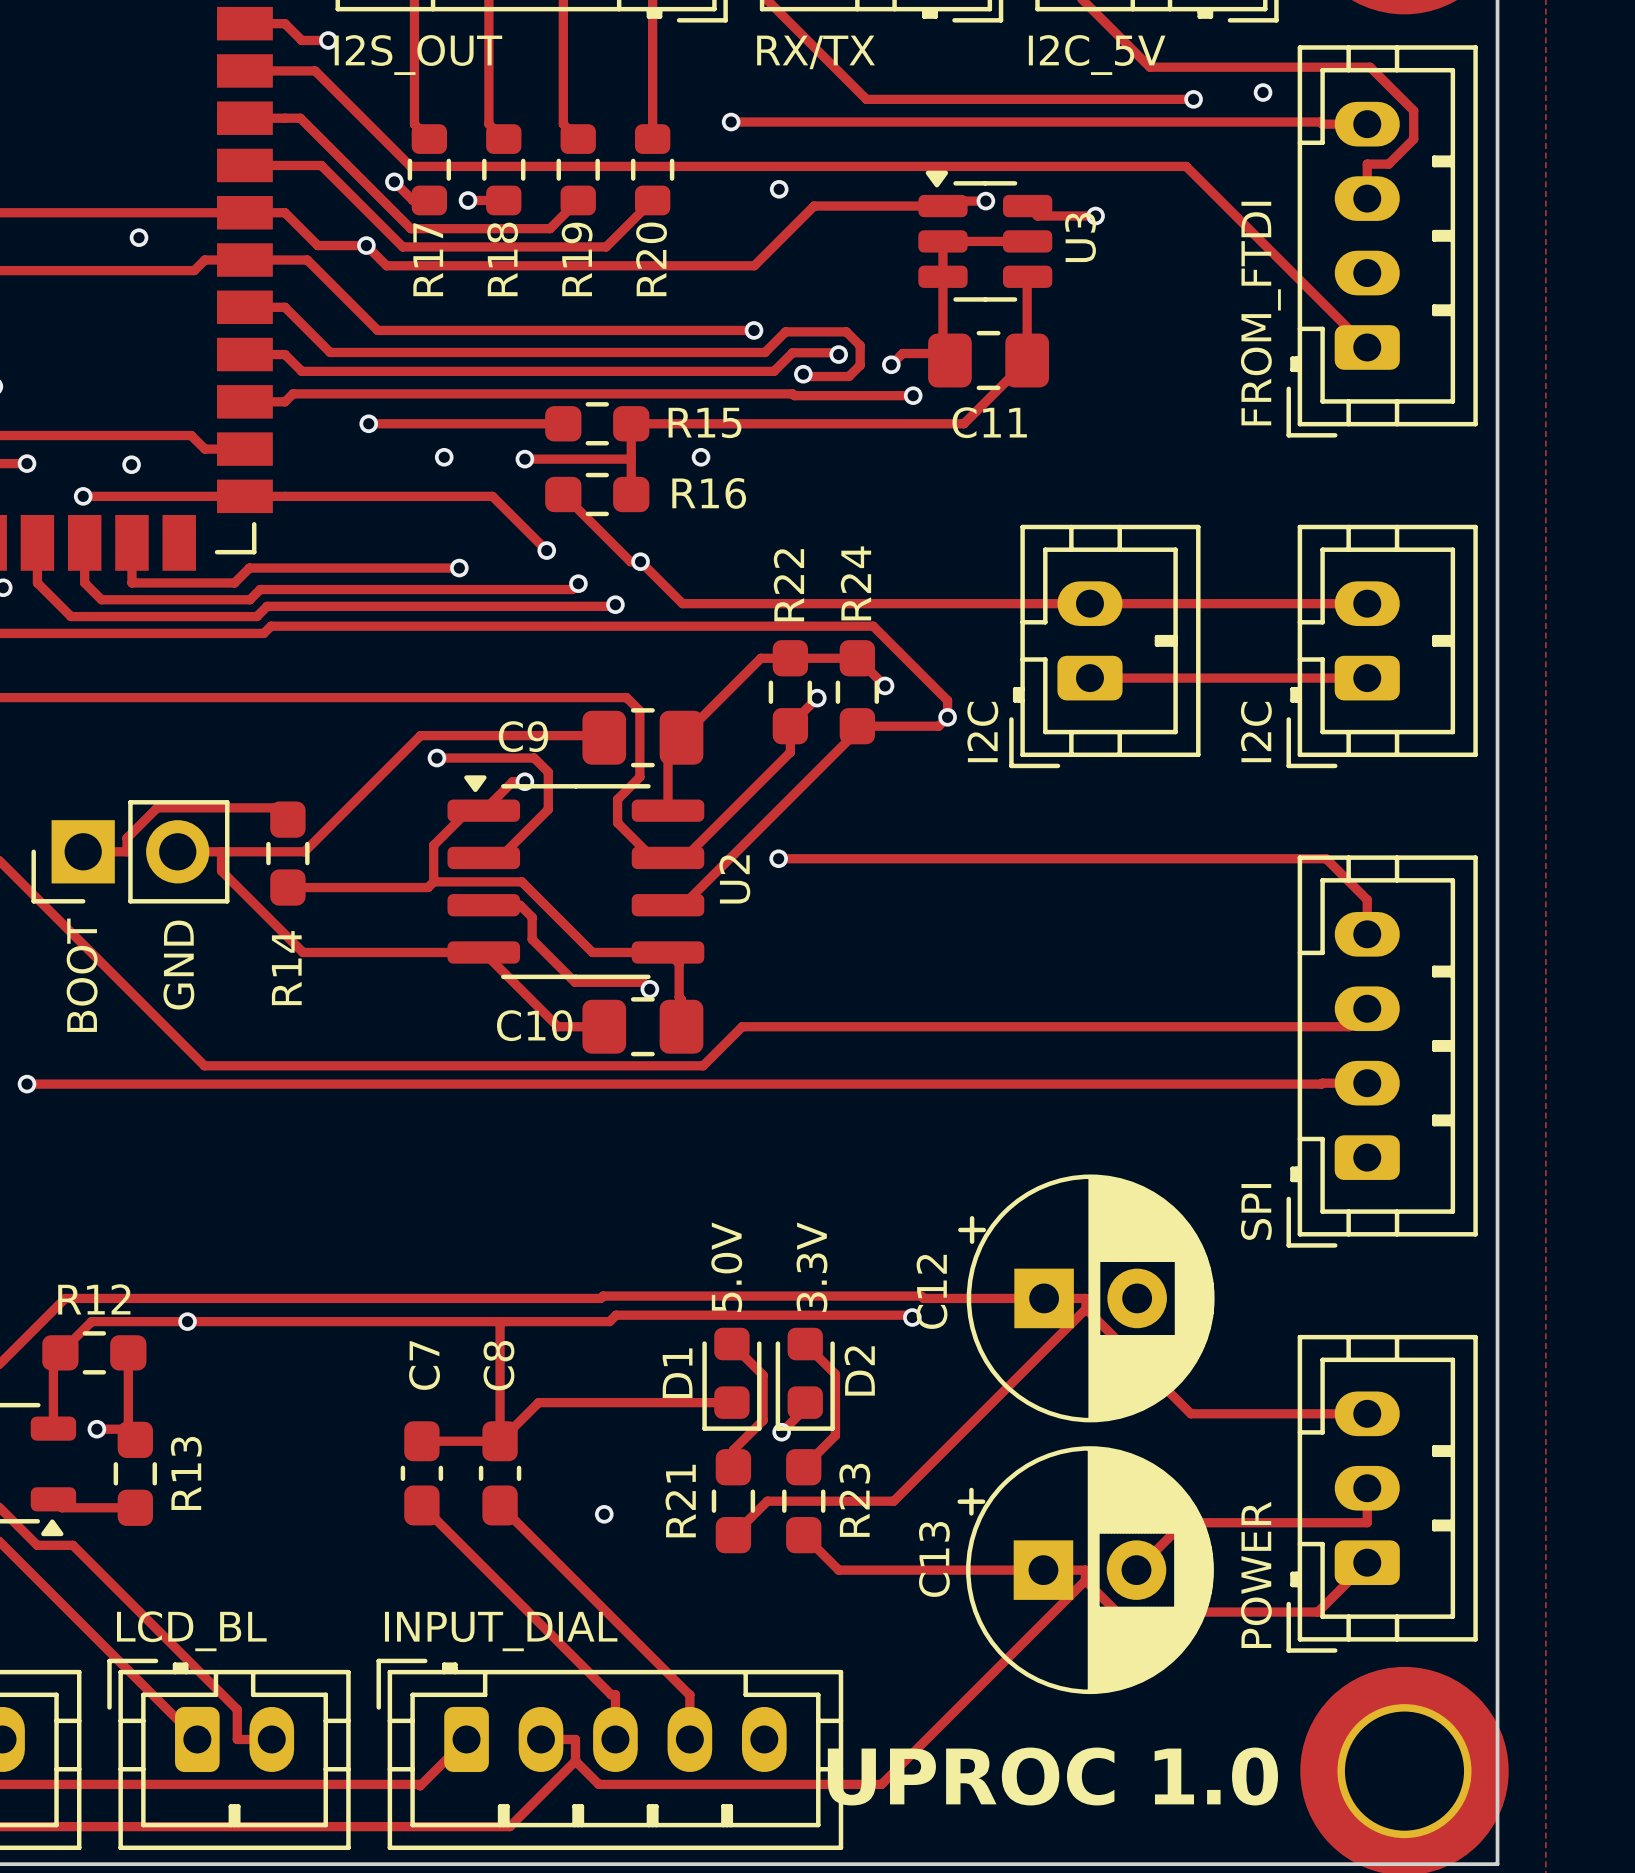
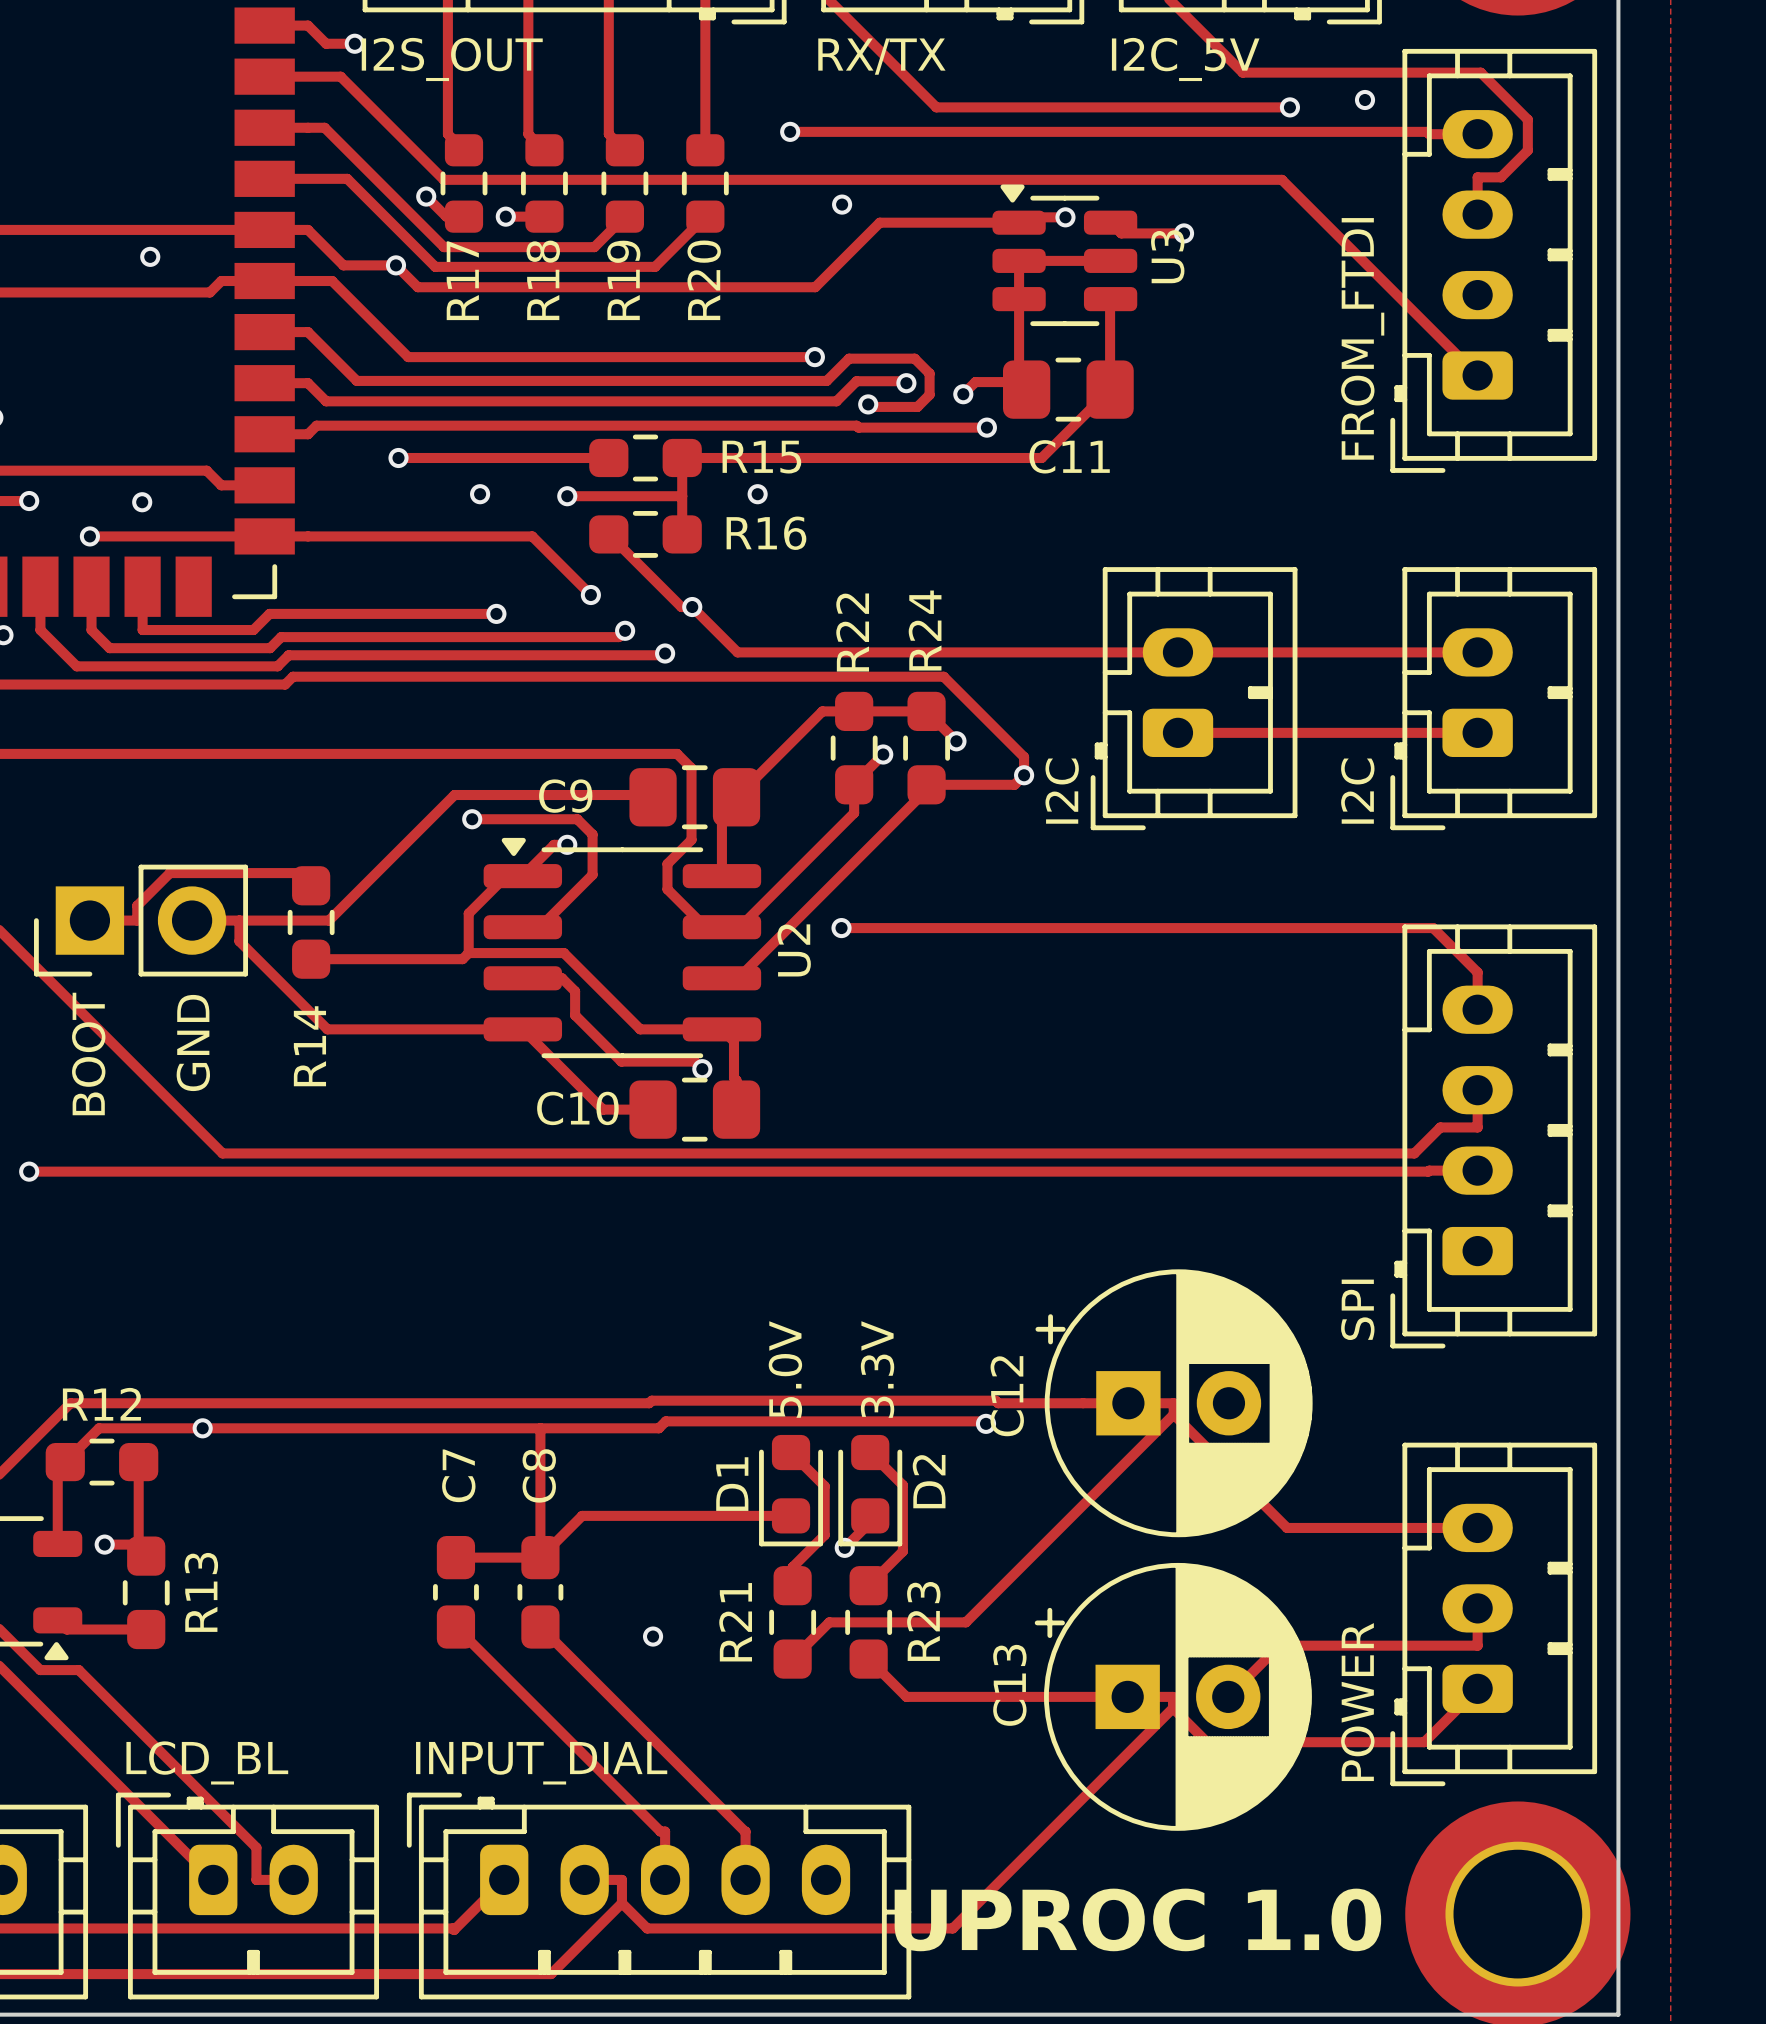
track: (1367, 1008) (1349, 1026) (742, 1026) (703, 1065) (204, 1065) -> (1477, 1090) (1477, 1127) (1440, 1127) (1414, 1153) (222, 1153) (221, 1151)

